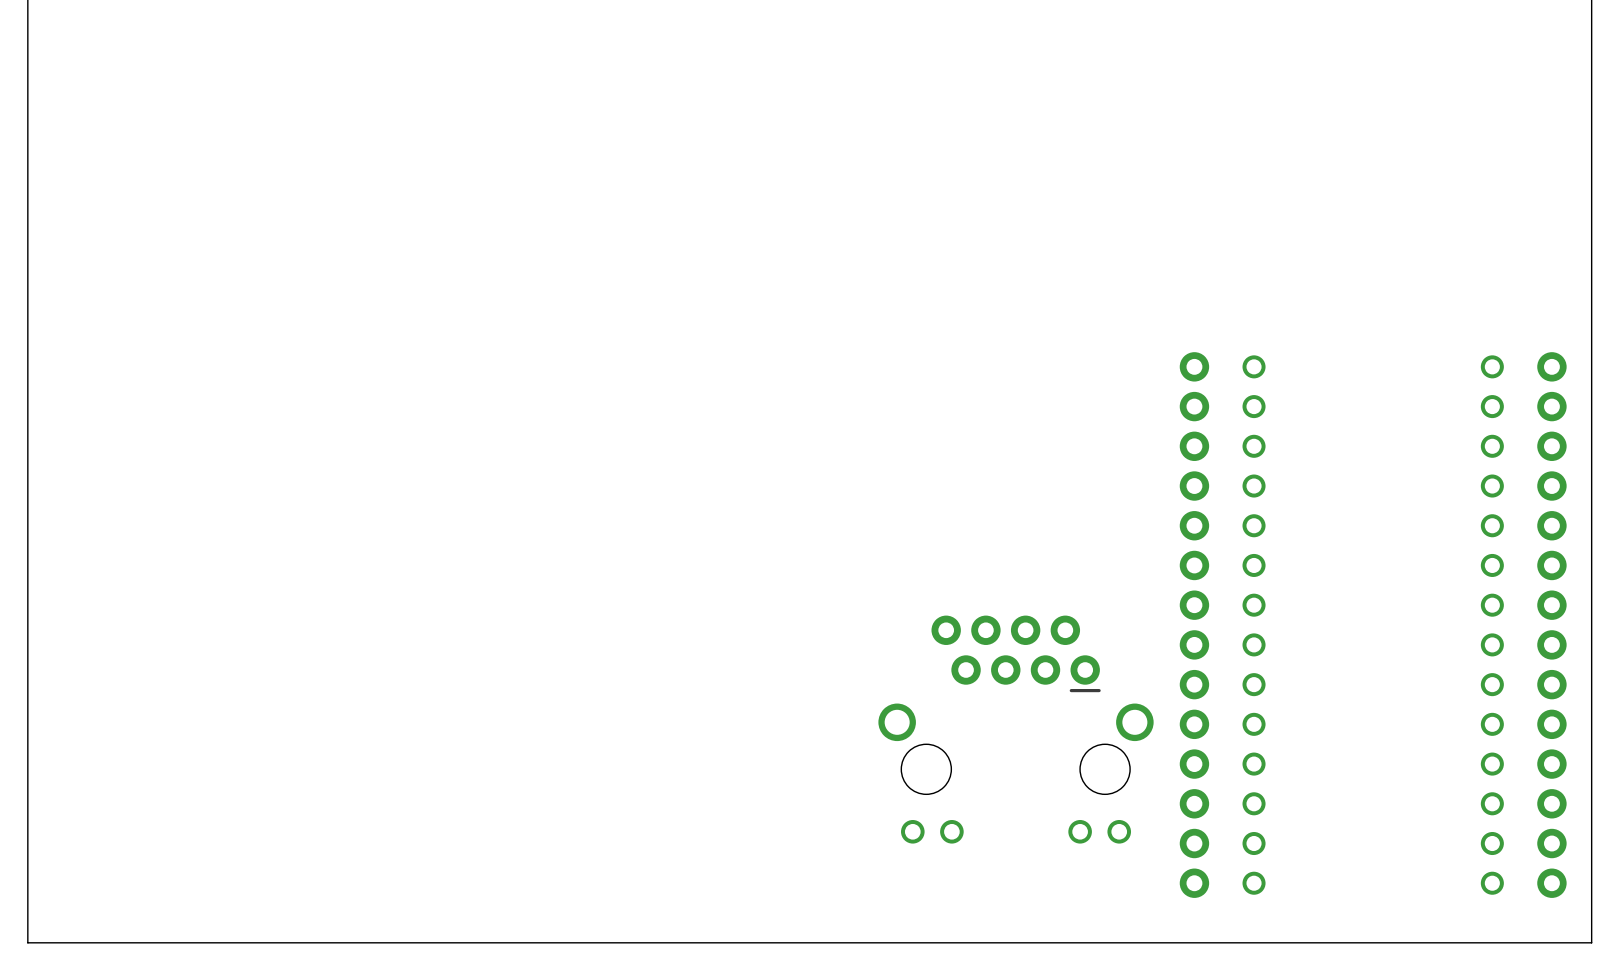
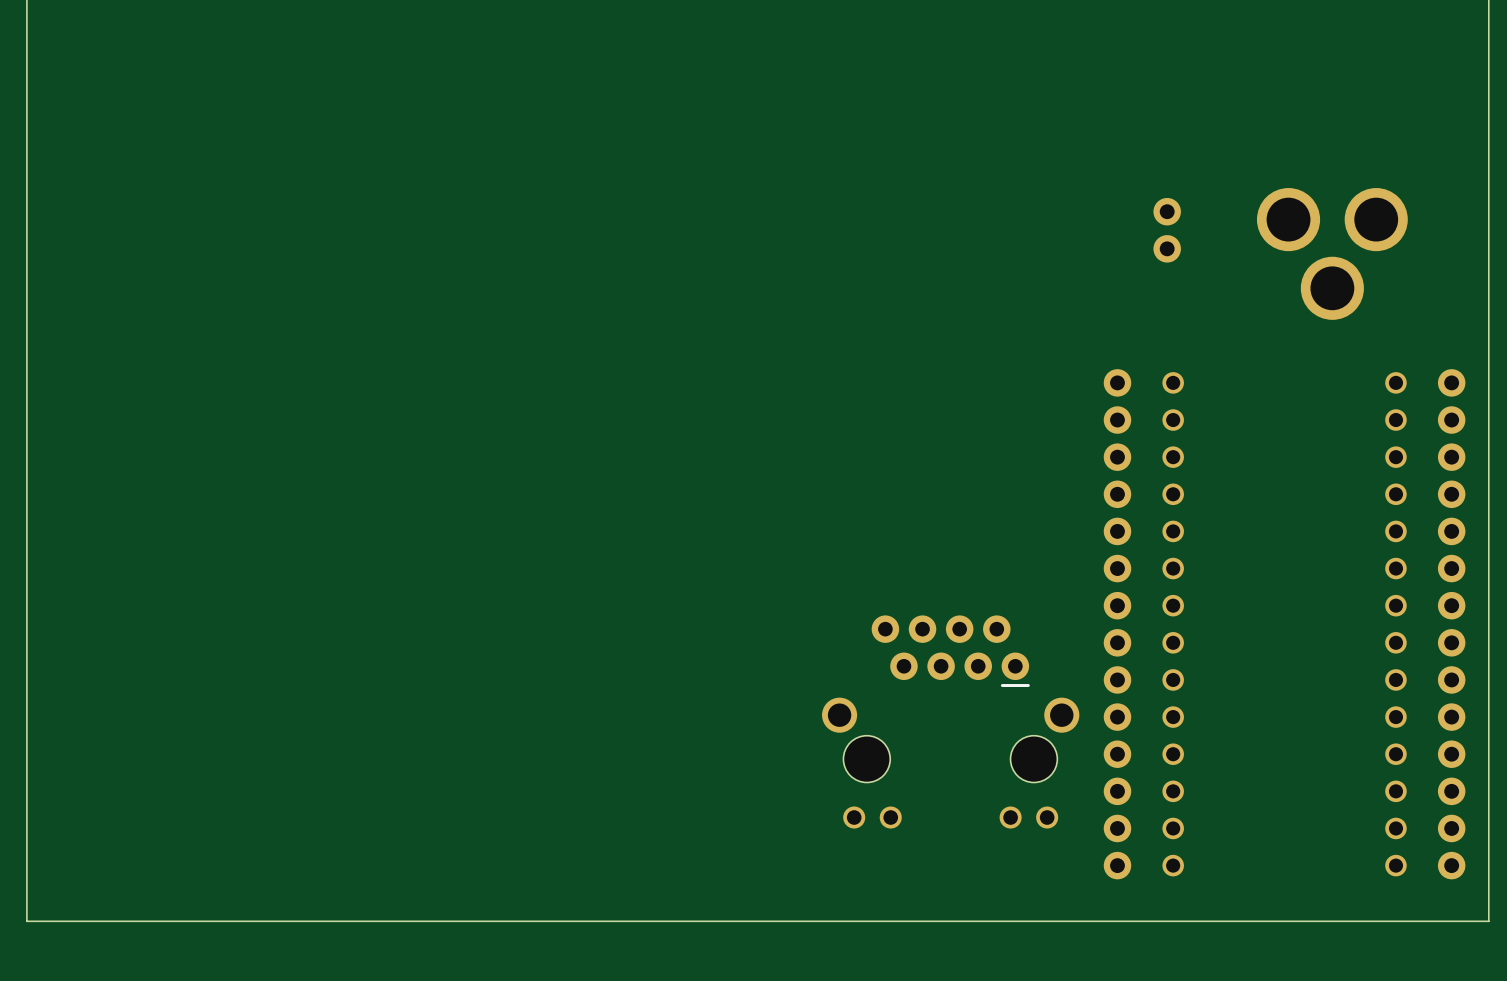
part: none -> (1167, 230)
part: none -> (1332, 253)

